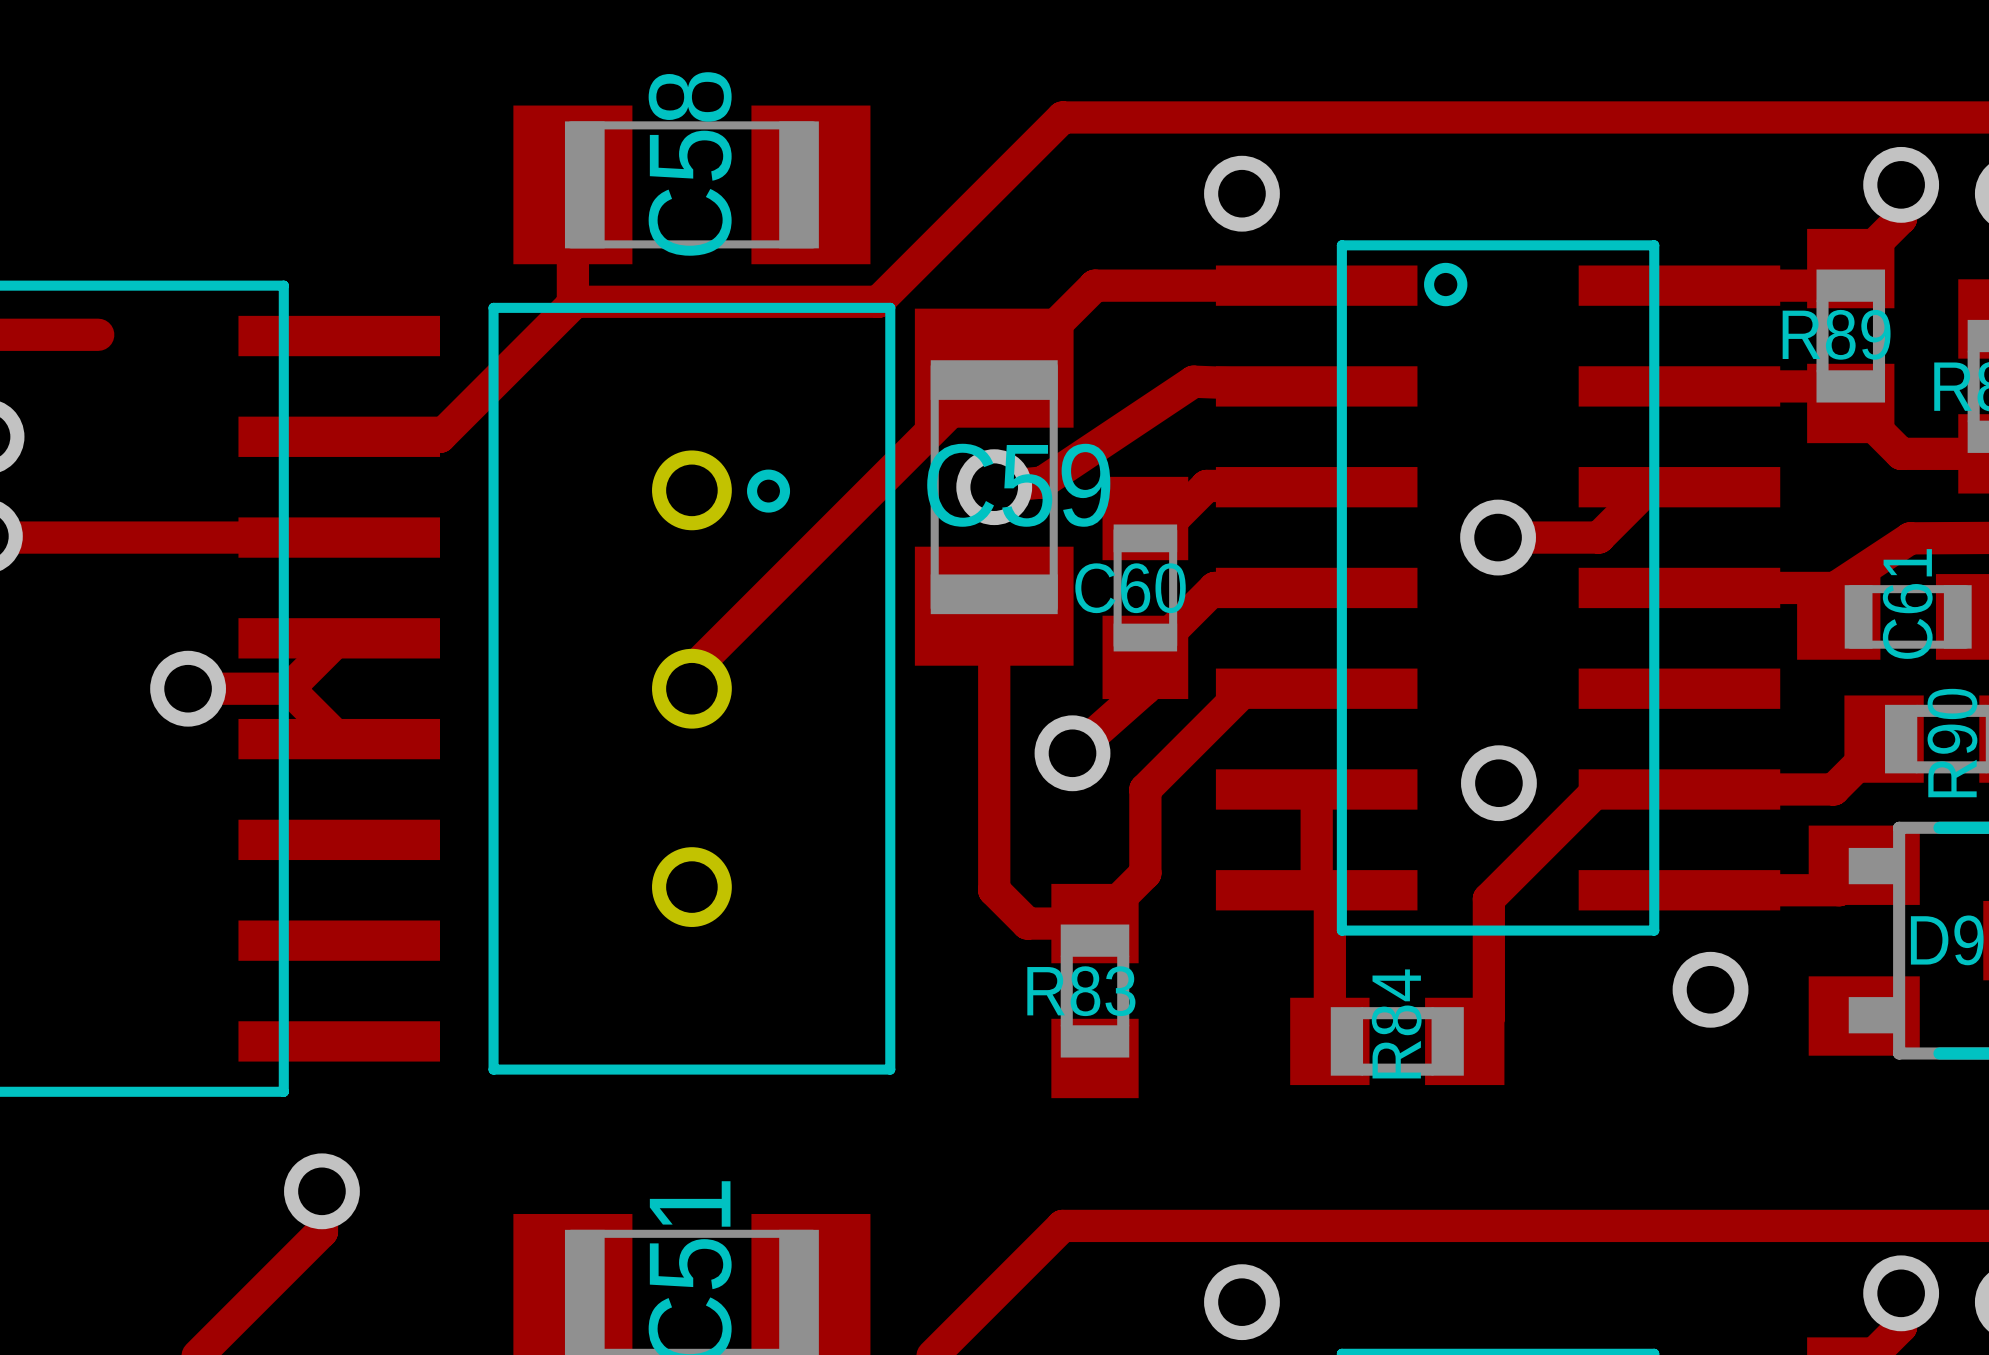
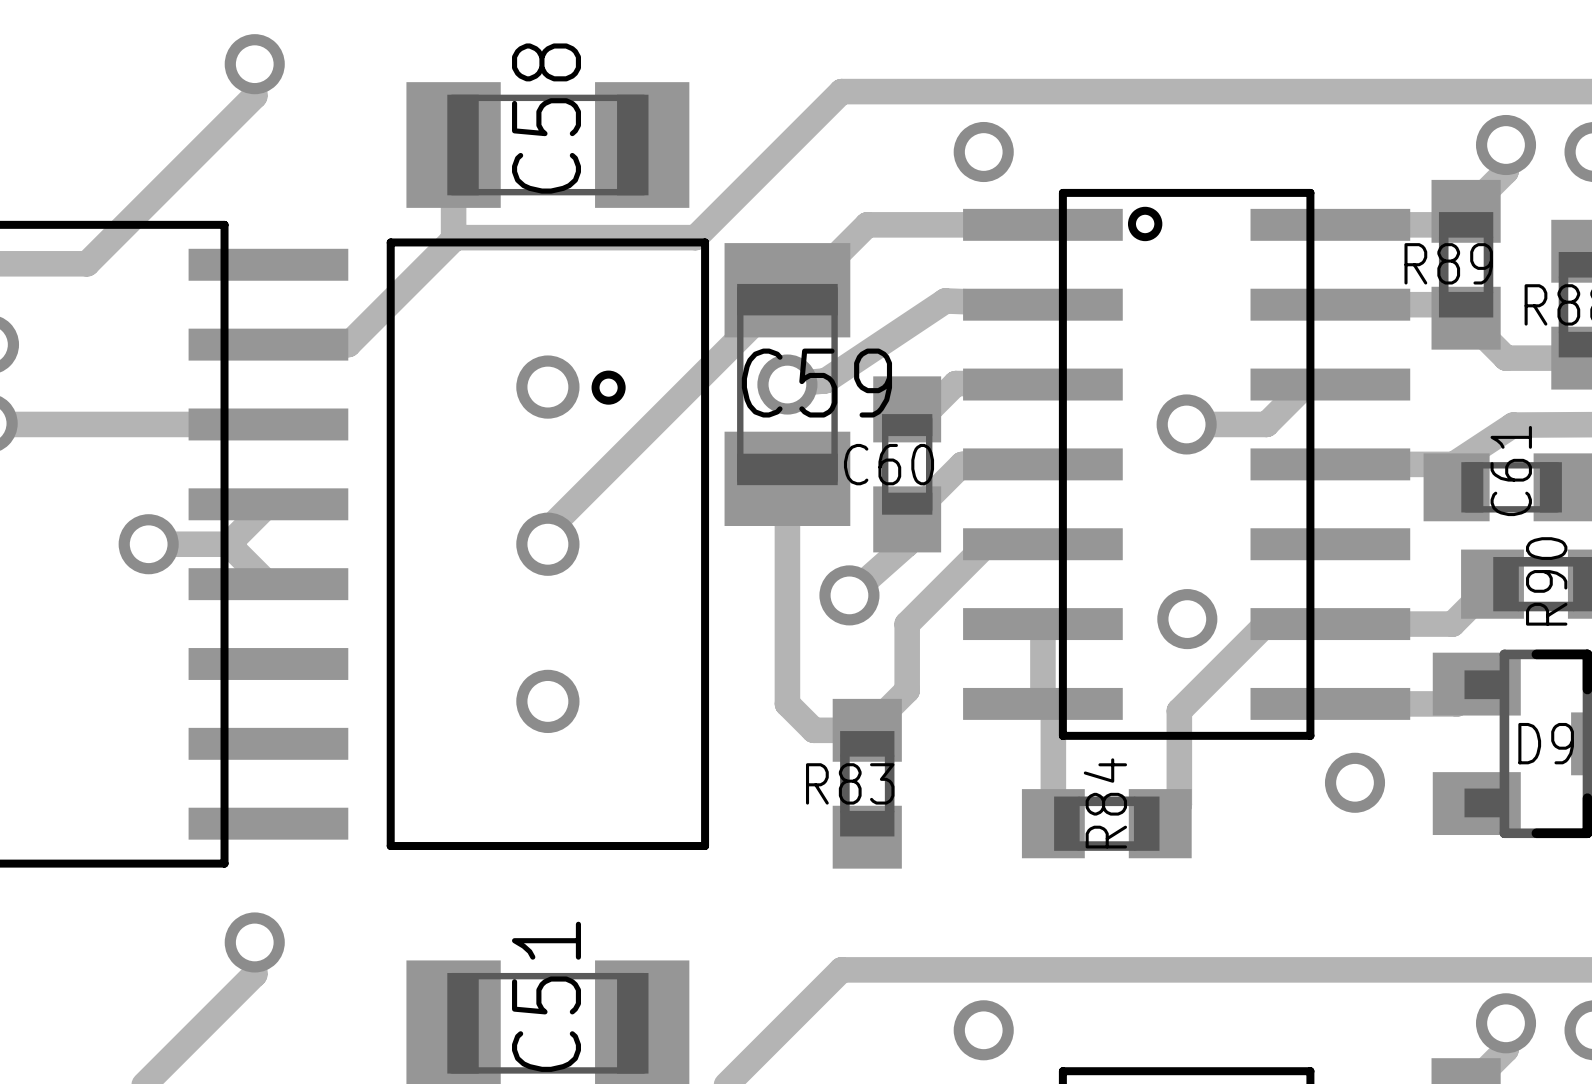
track: none -> (254, 64) (254, 96) (87, 263) (77, 263)
via: none -> (254, 64)

